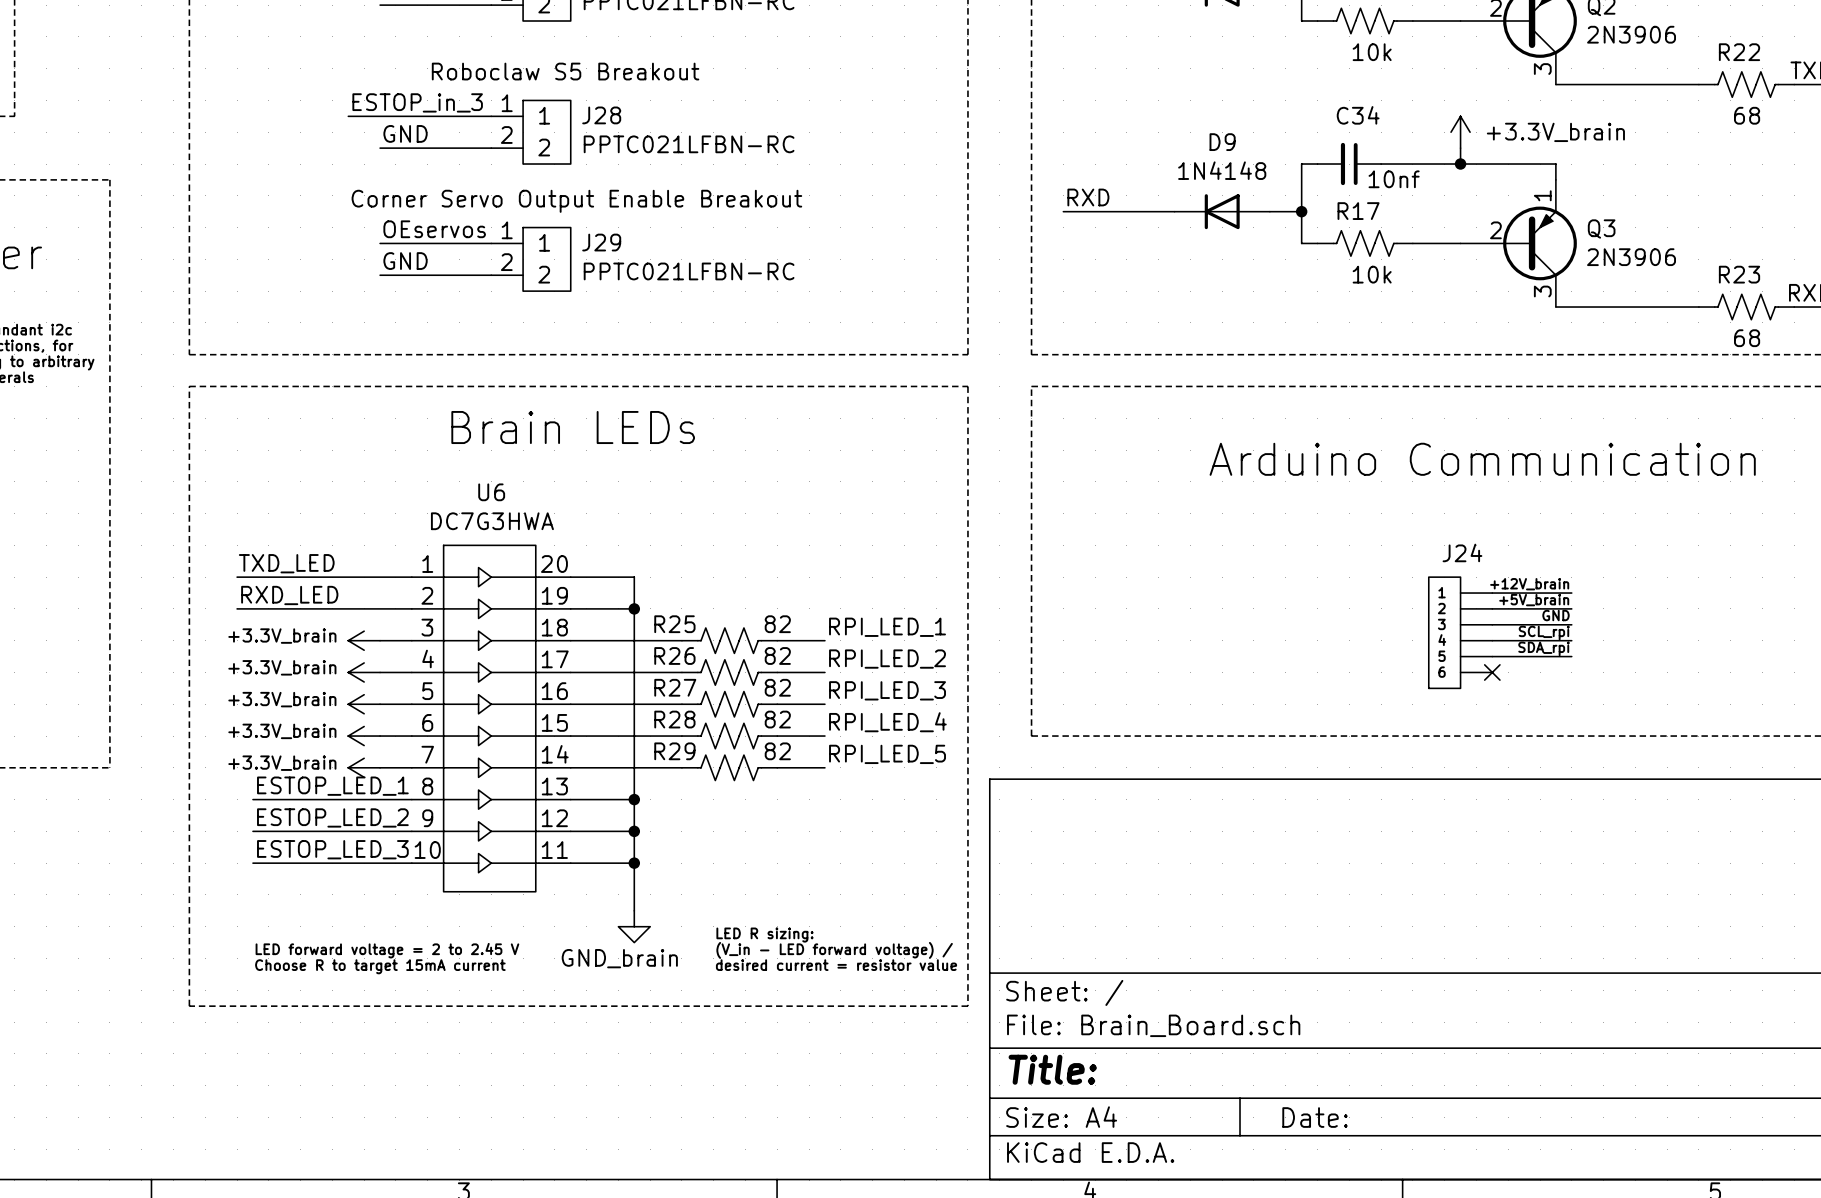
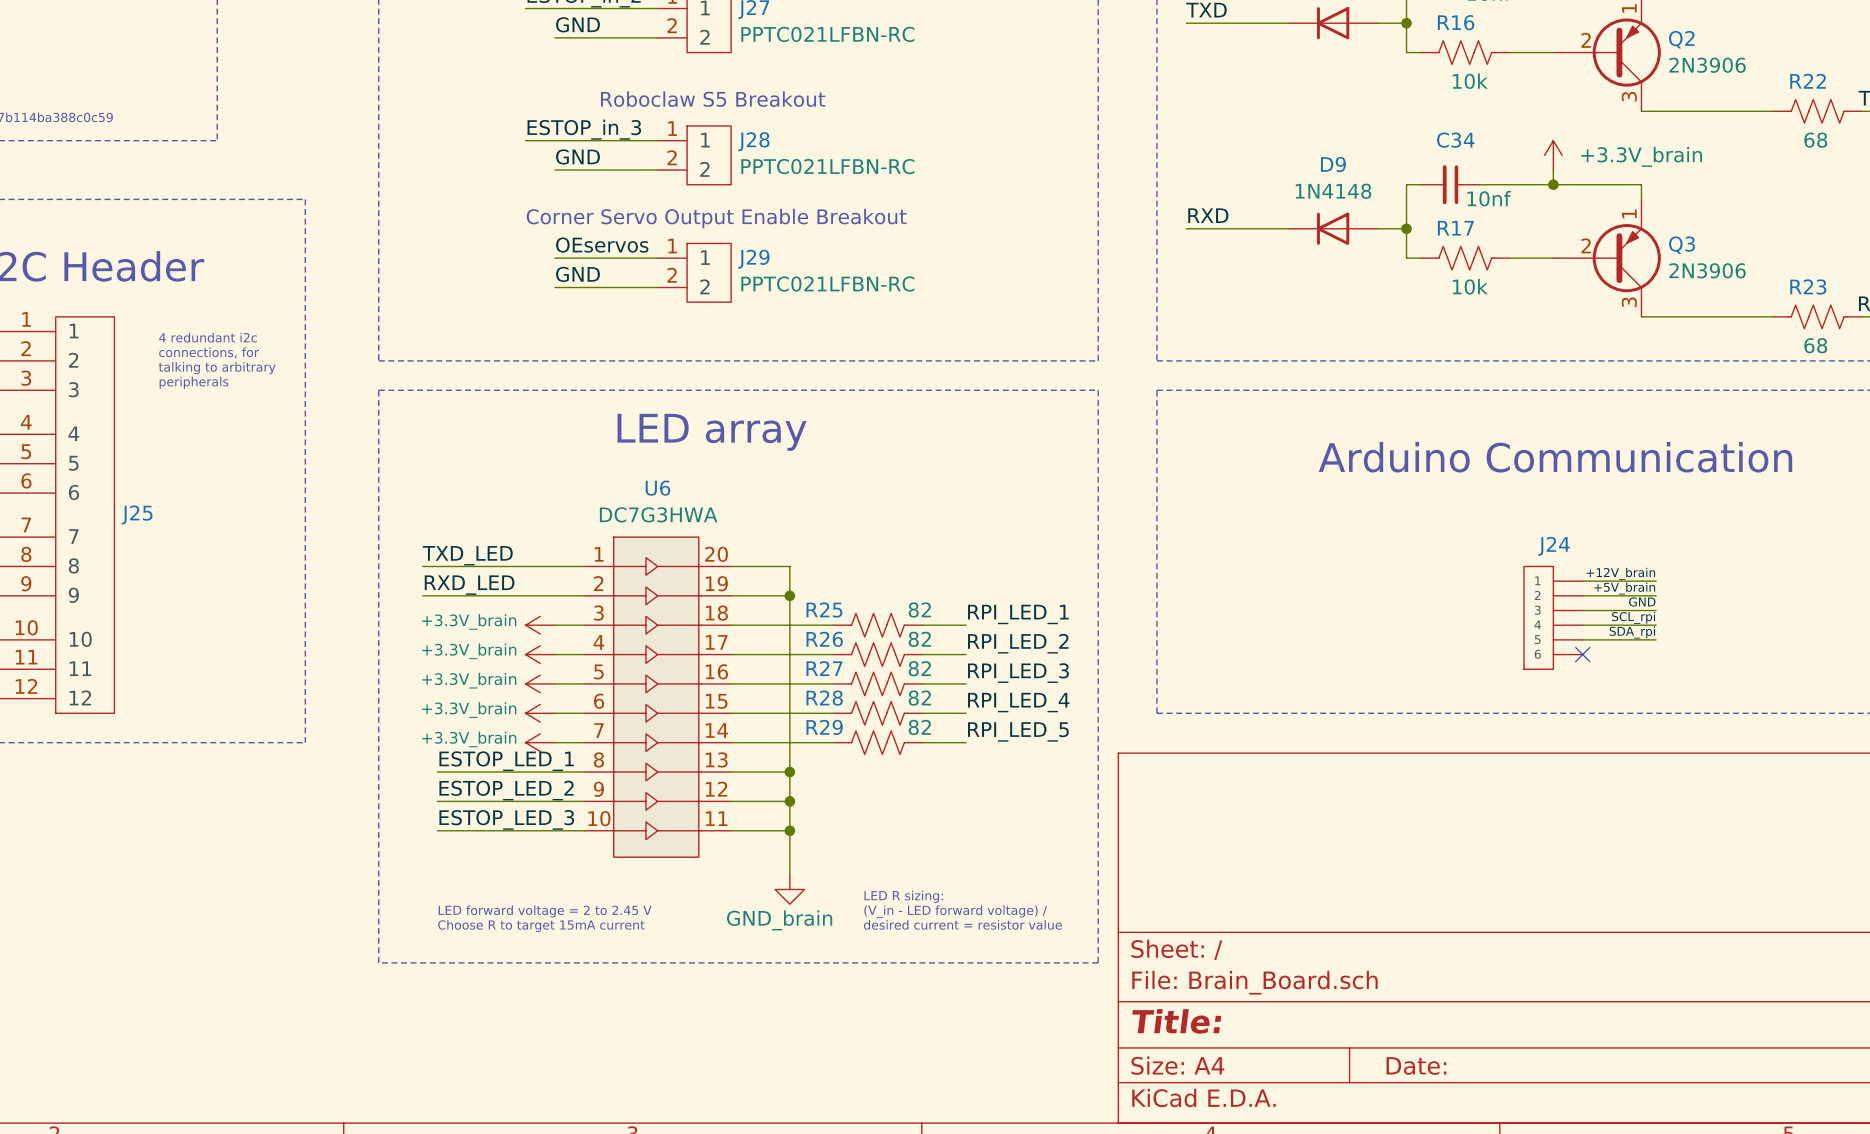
text: Brain LEDs (573, 427) -> LED array (712, 432)

